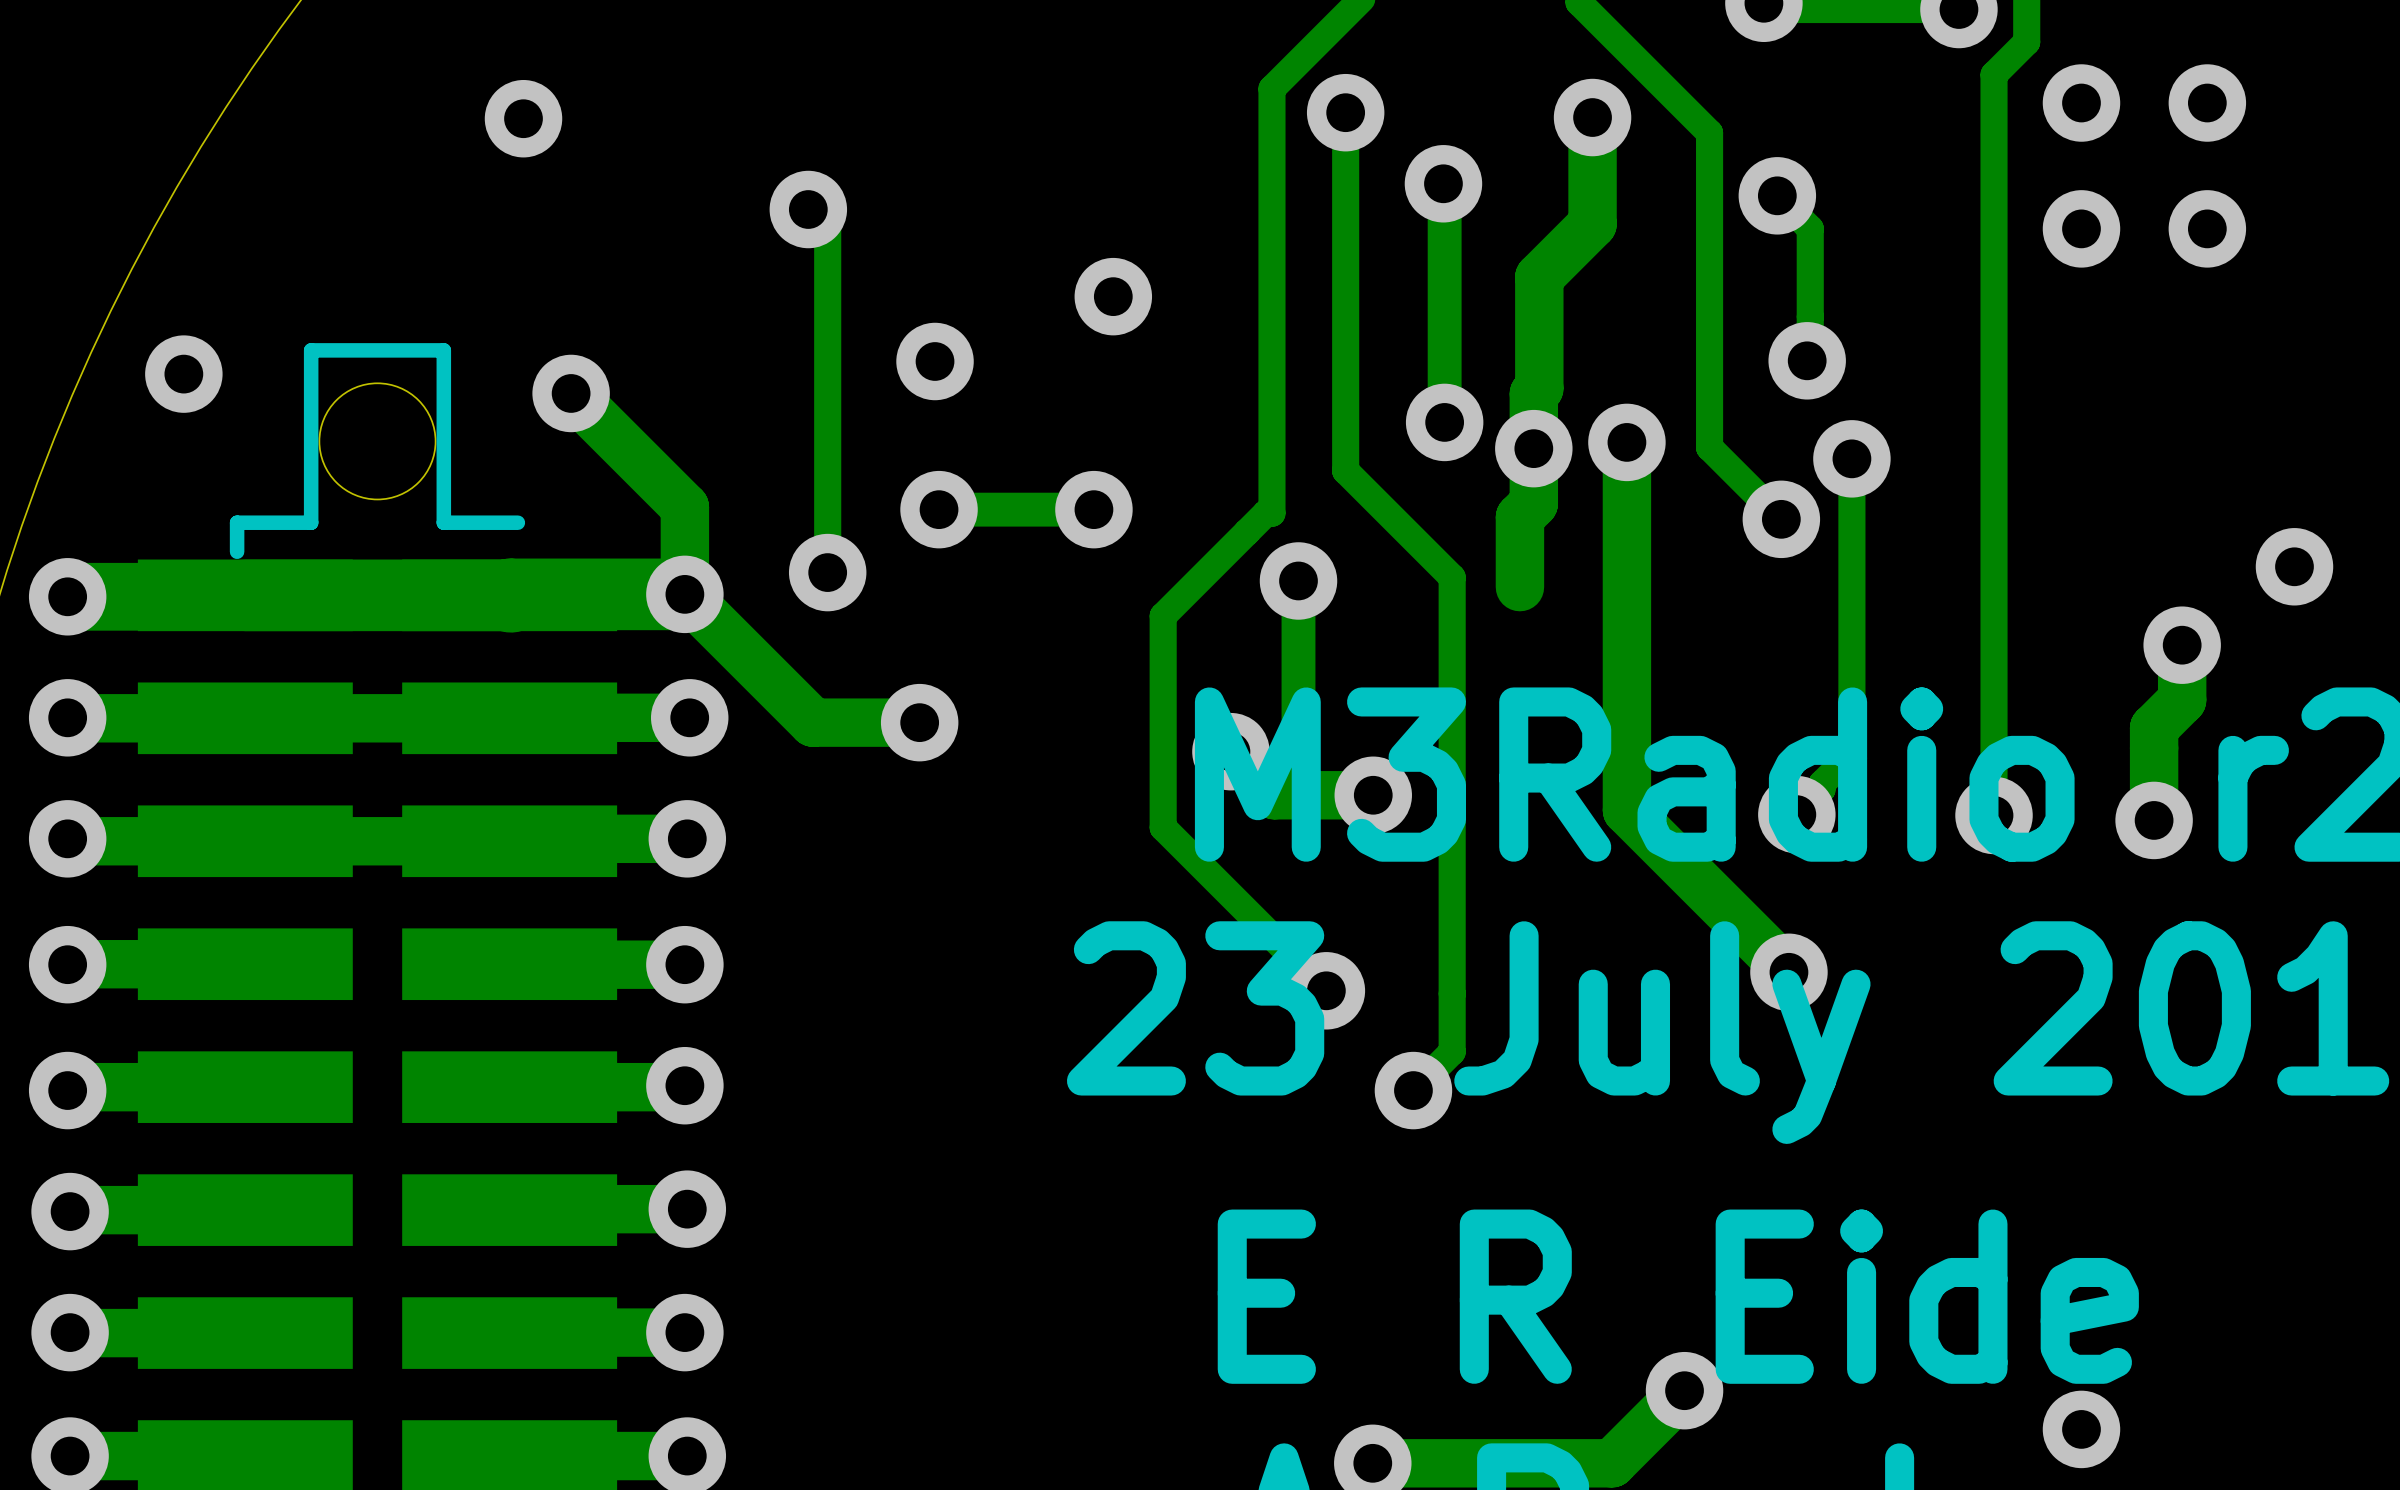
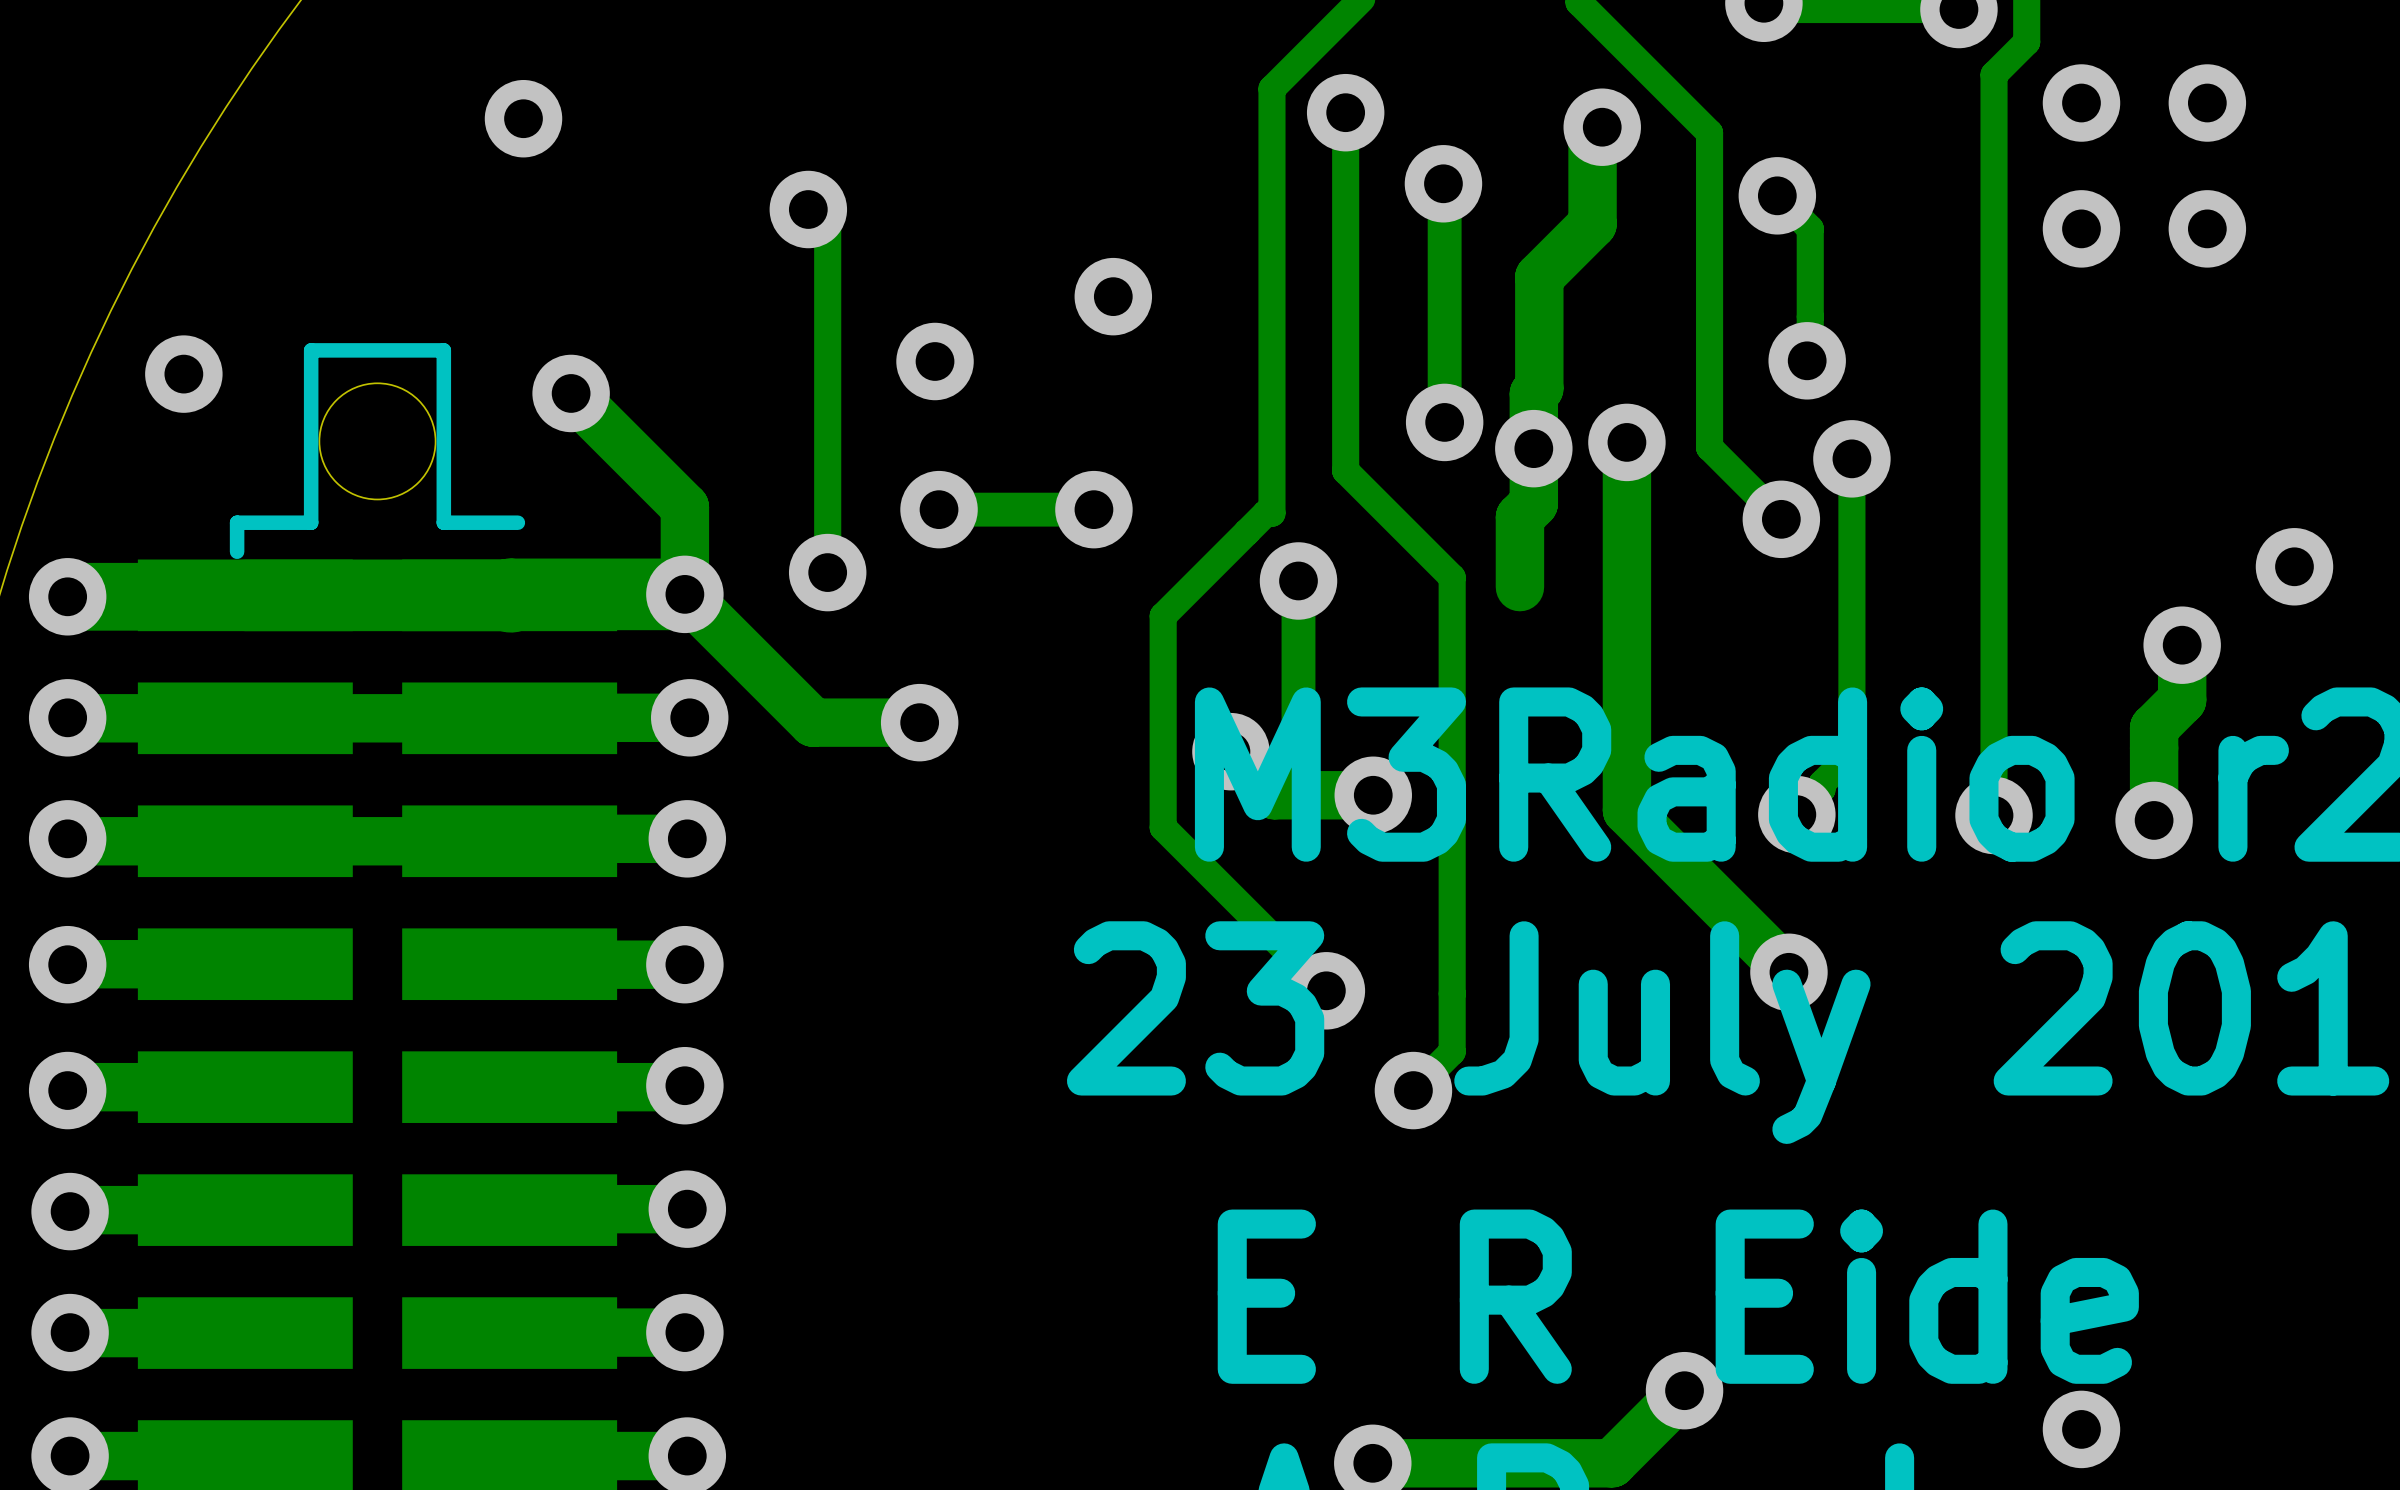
via position: (1592, 117) -> (1602, 127)

